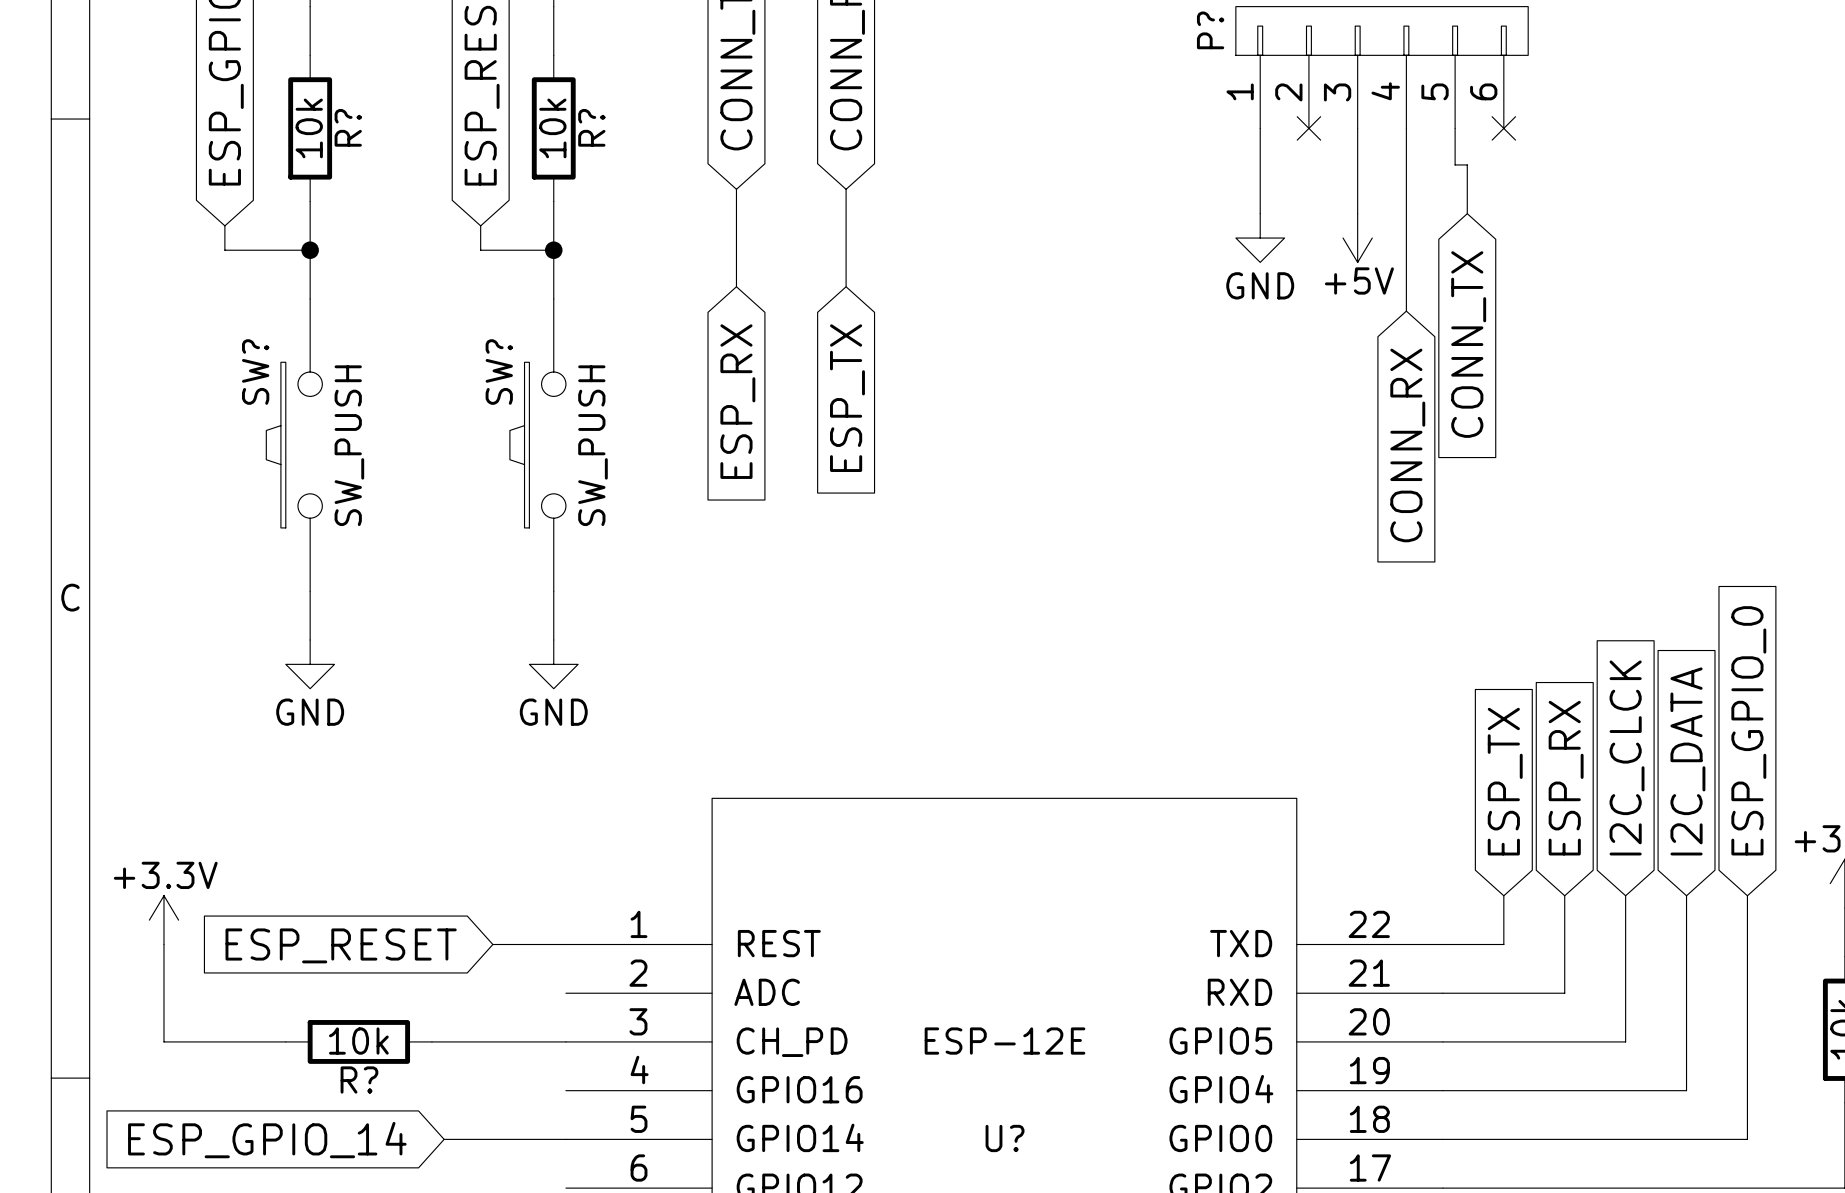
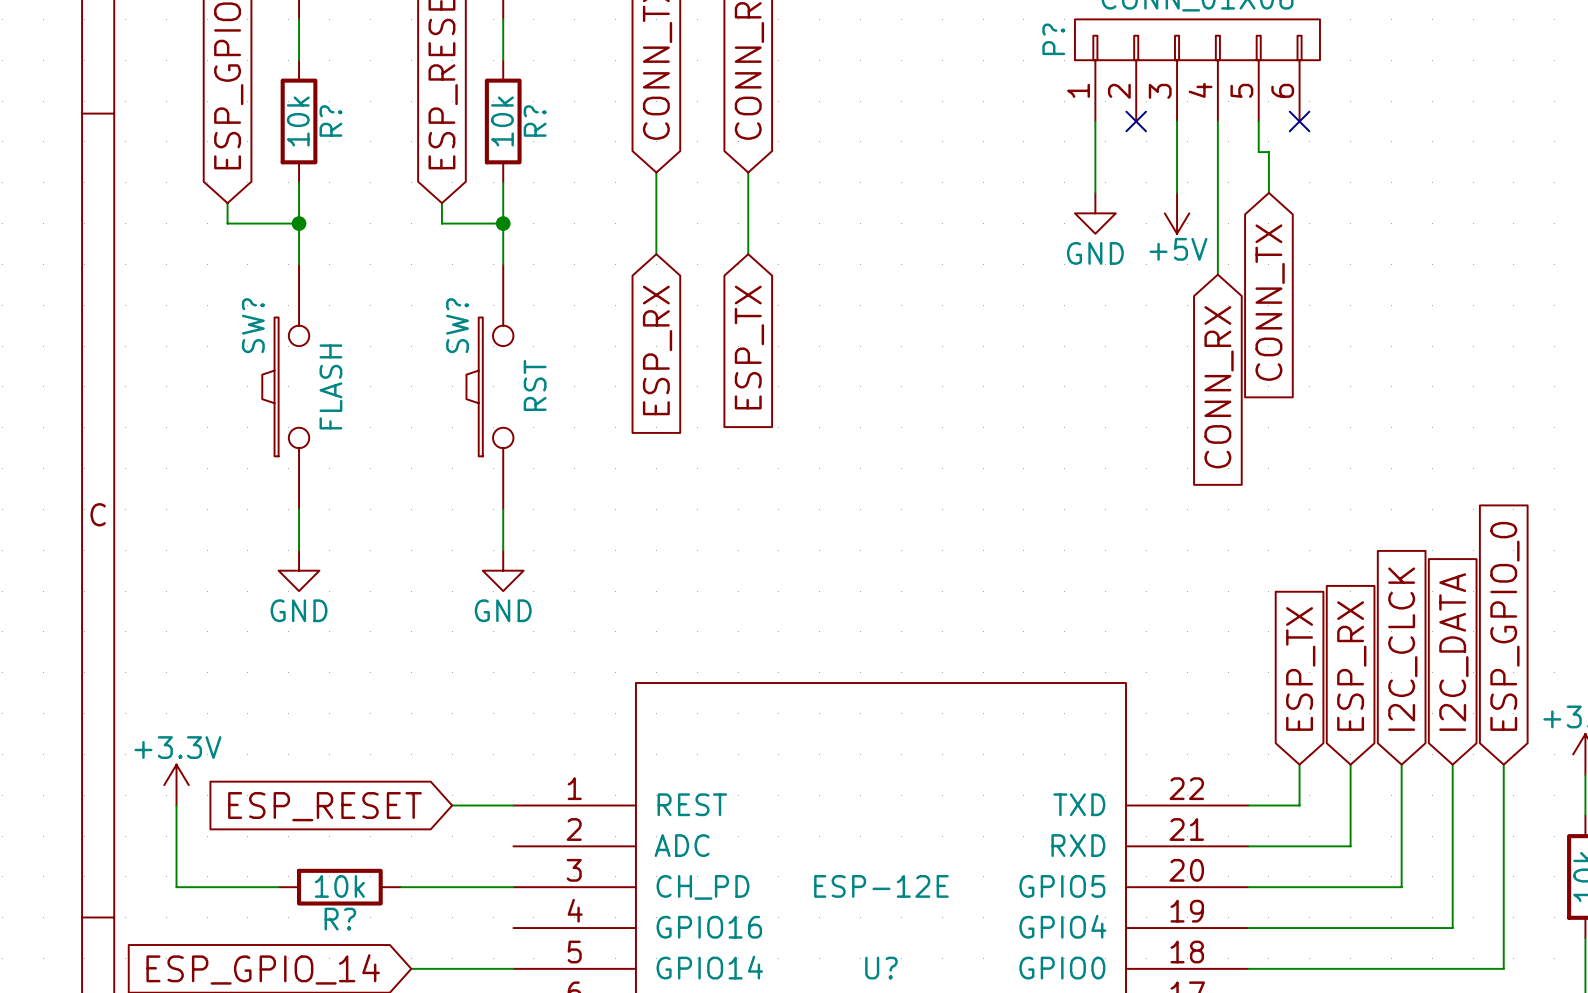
SW? value: SW_PUSH (349, 445) -> FLASH (330, 386)
SW? value: SW_PUSH (592, 445) -> RST (535, 385)

